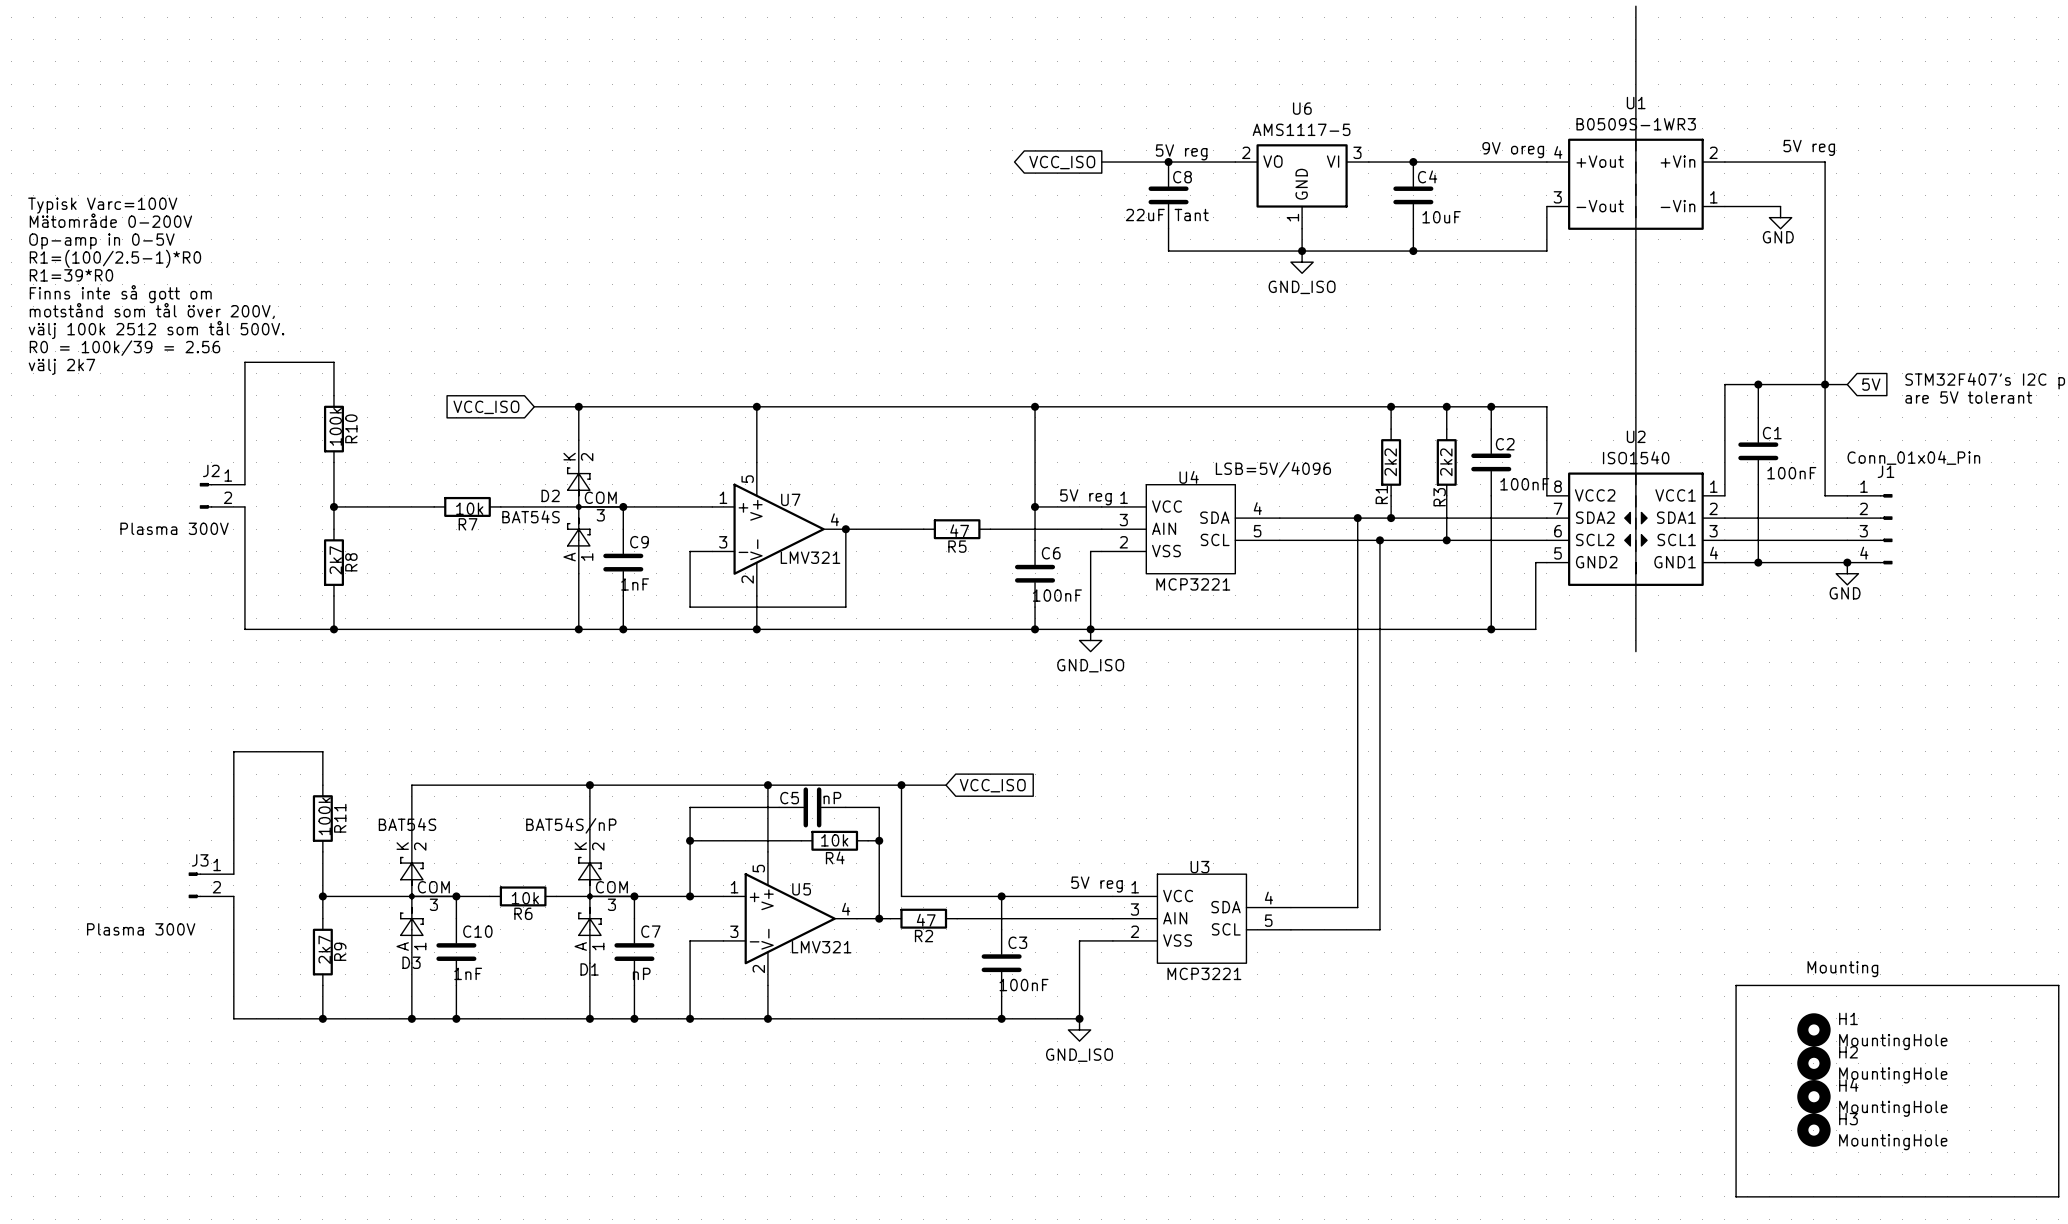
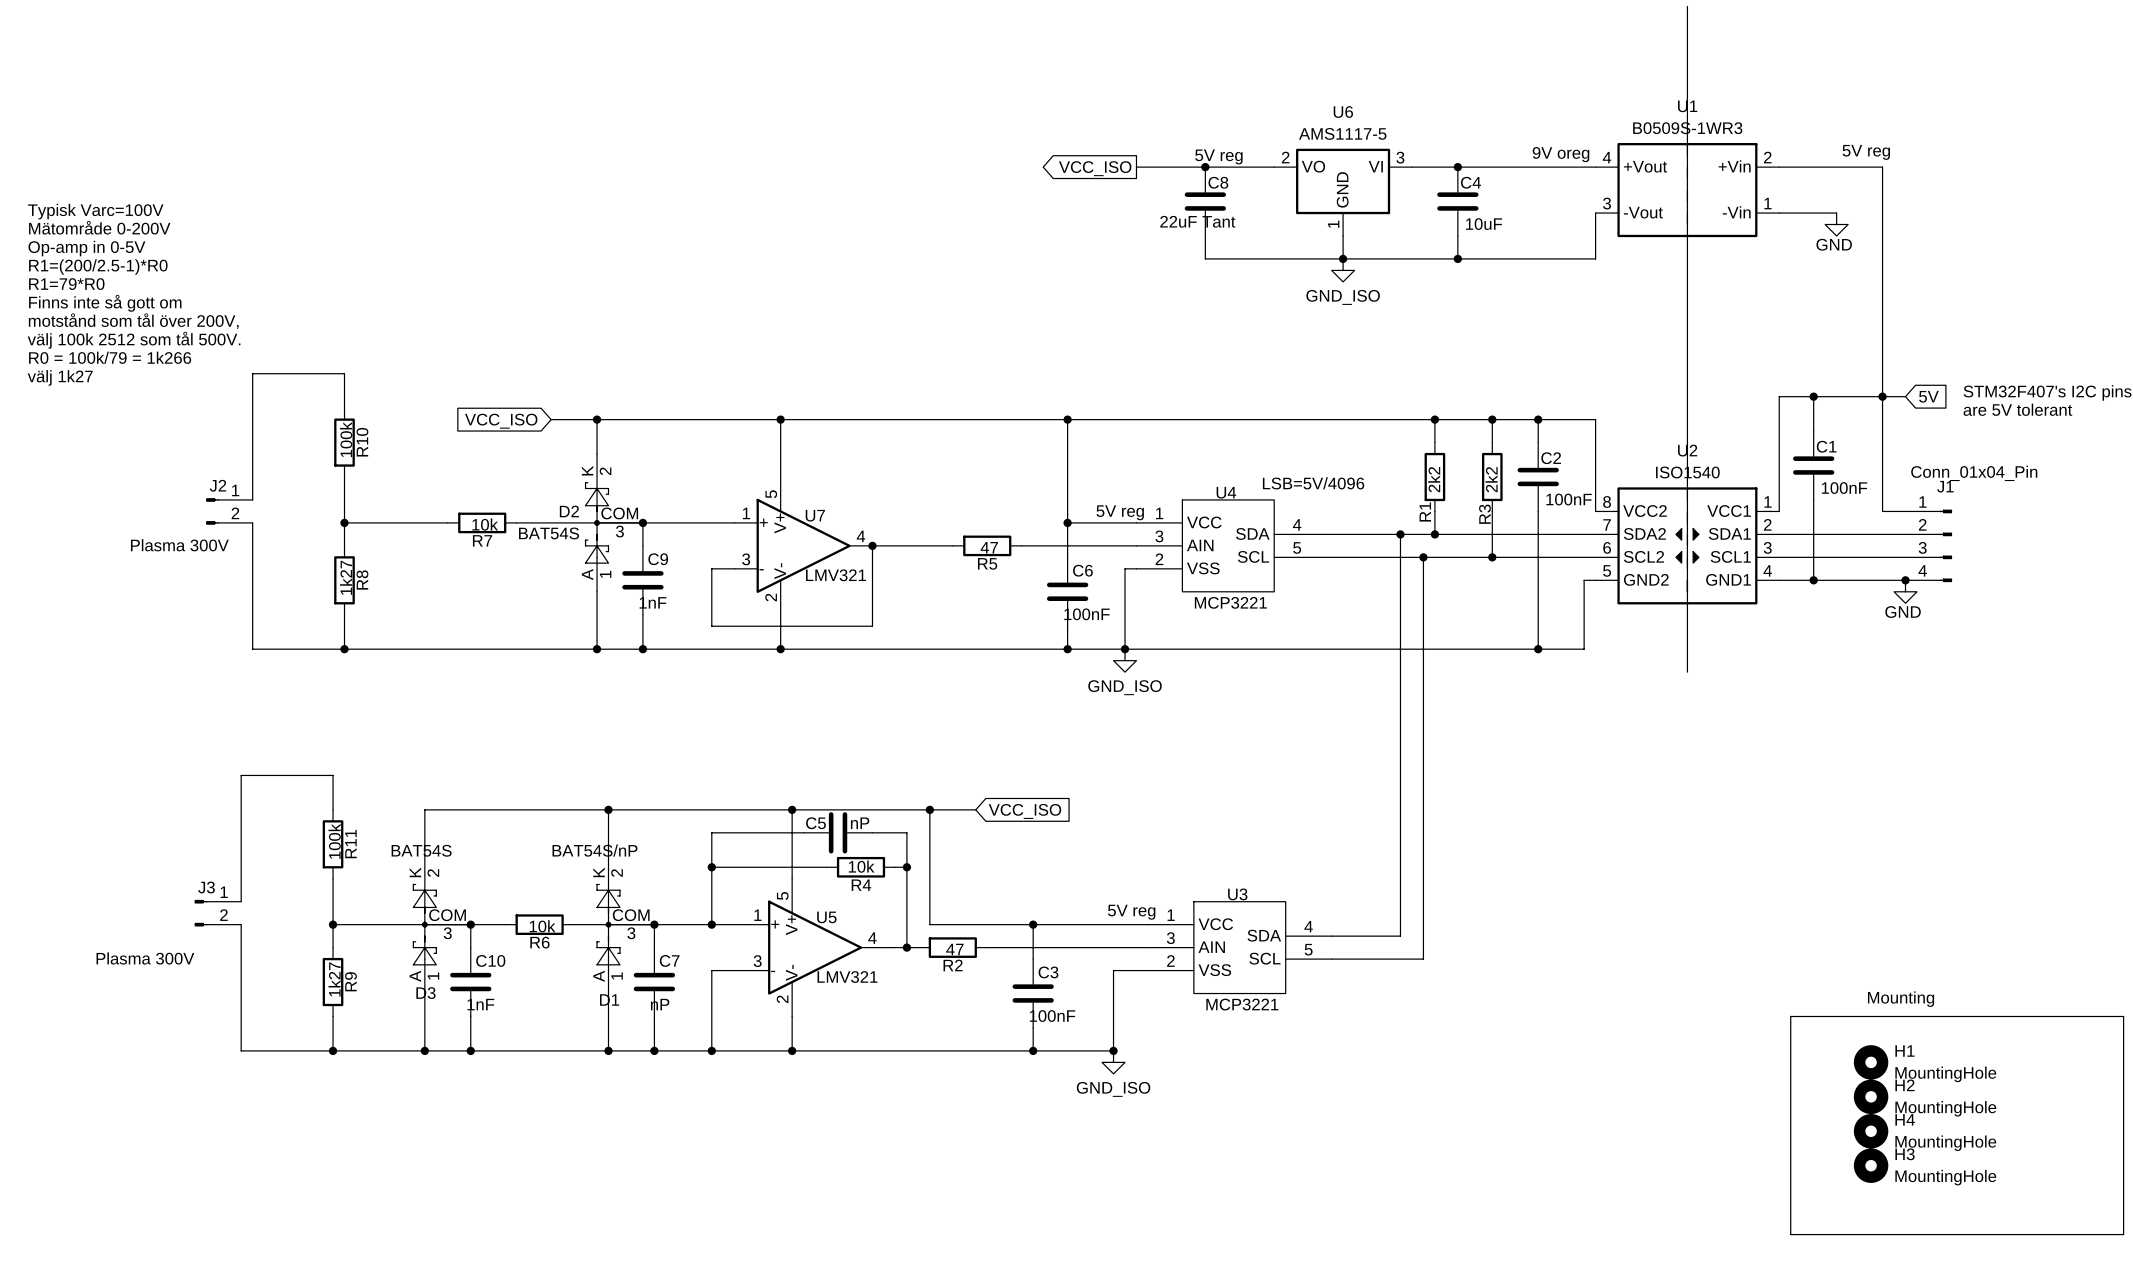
text: R1=(100/2.5-1)*R0 (115, 258) -> R1=(200/2.5-1)*R0 (98, 267)
text: R1=39*R0 (71, 275) -> R1=79*R0 (66, 284)
text: R0 = 100k/39 = 2.56 (124, 348) -> R0 = 100k/79 = 1k266 (110, 357)
text: välj 2k7 (61, 366) -> välj 1k27 (60, 377)
R8 value: 2k7 (335, 560) -> 1k27 (346, 577)
R9 value: 2k7 (324, 949) -> 1k27 (334, 979)

